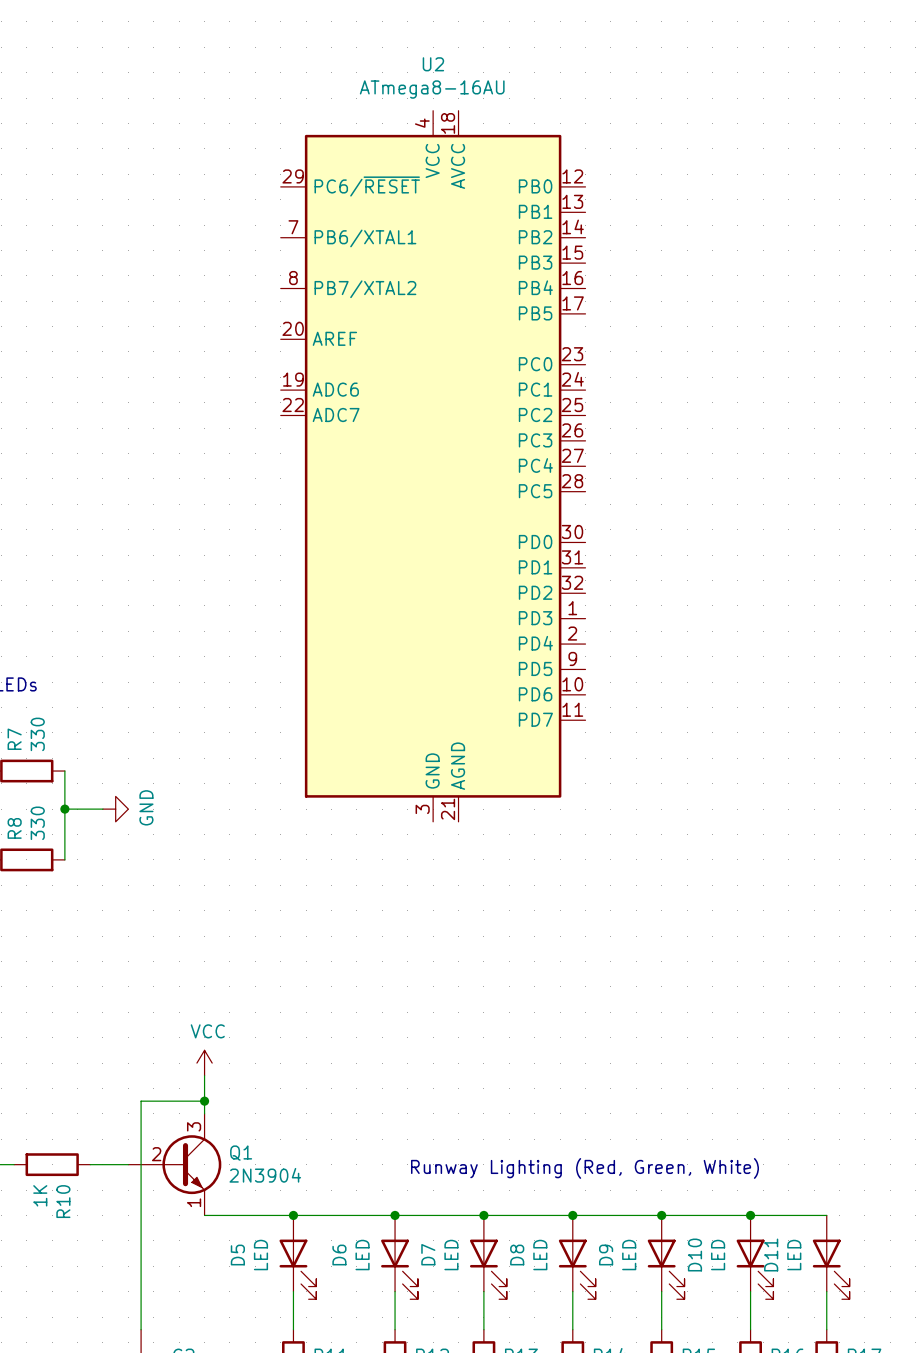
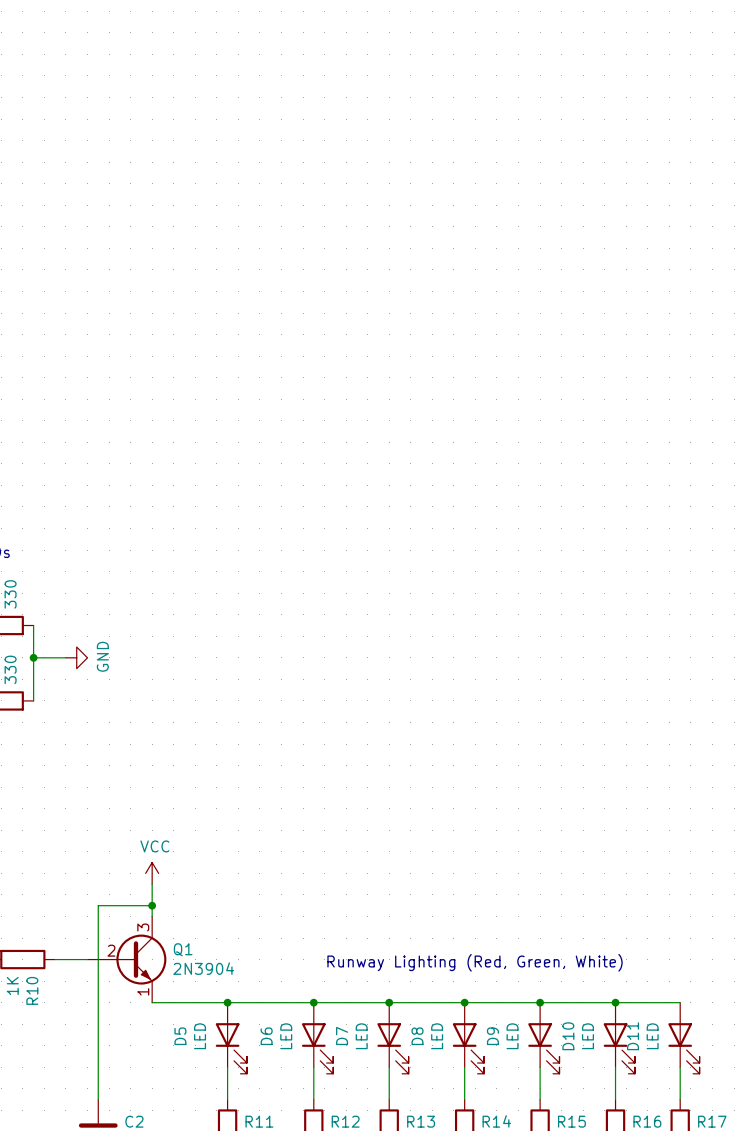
U2: ATmega8-16AU (433, 466) -> none

